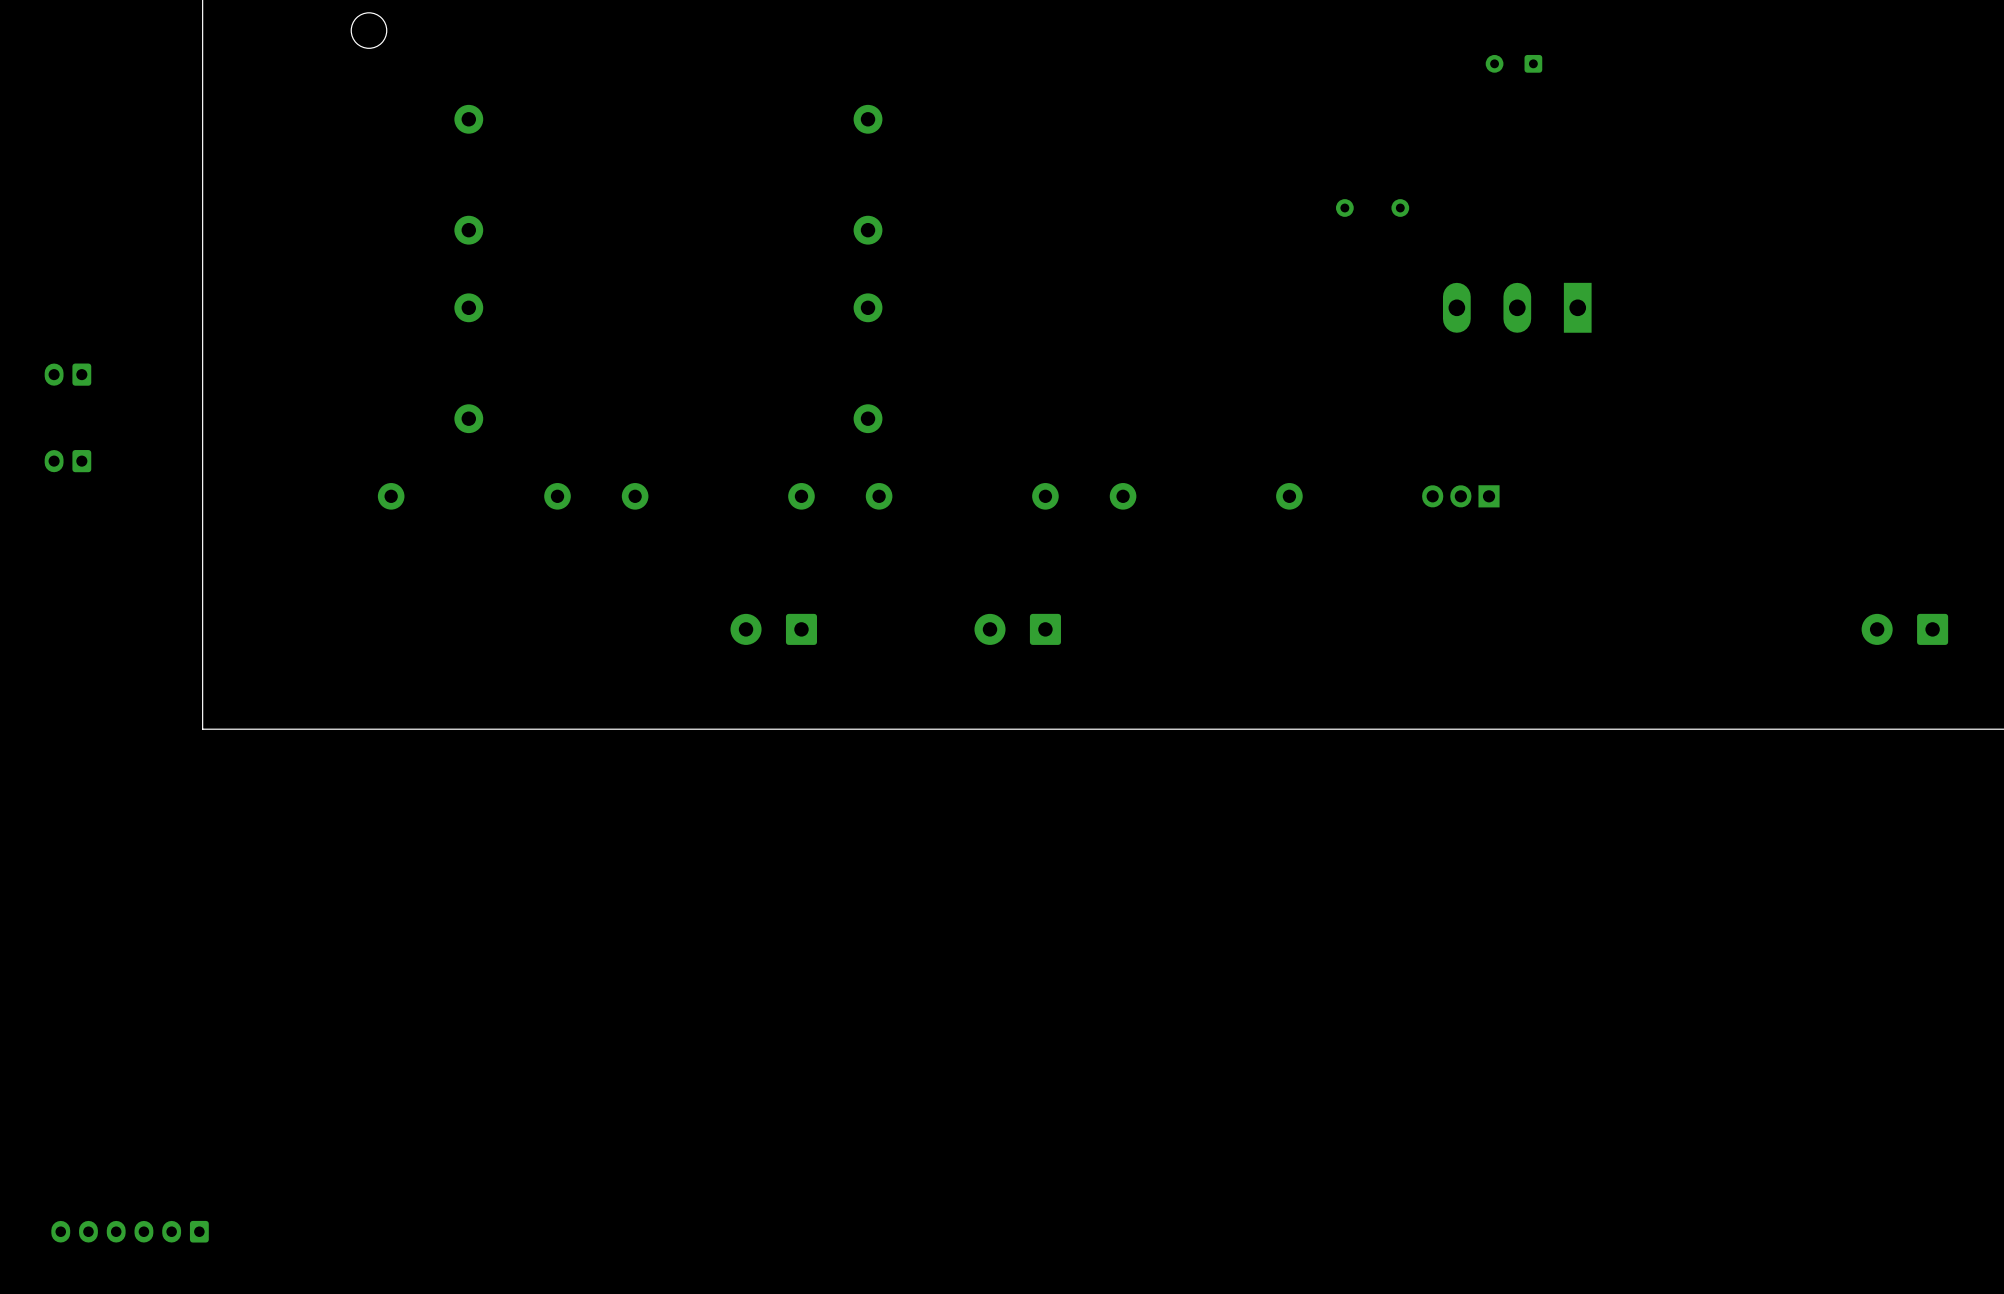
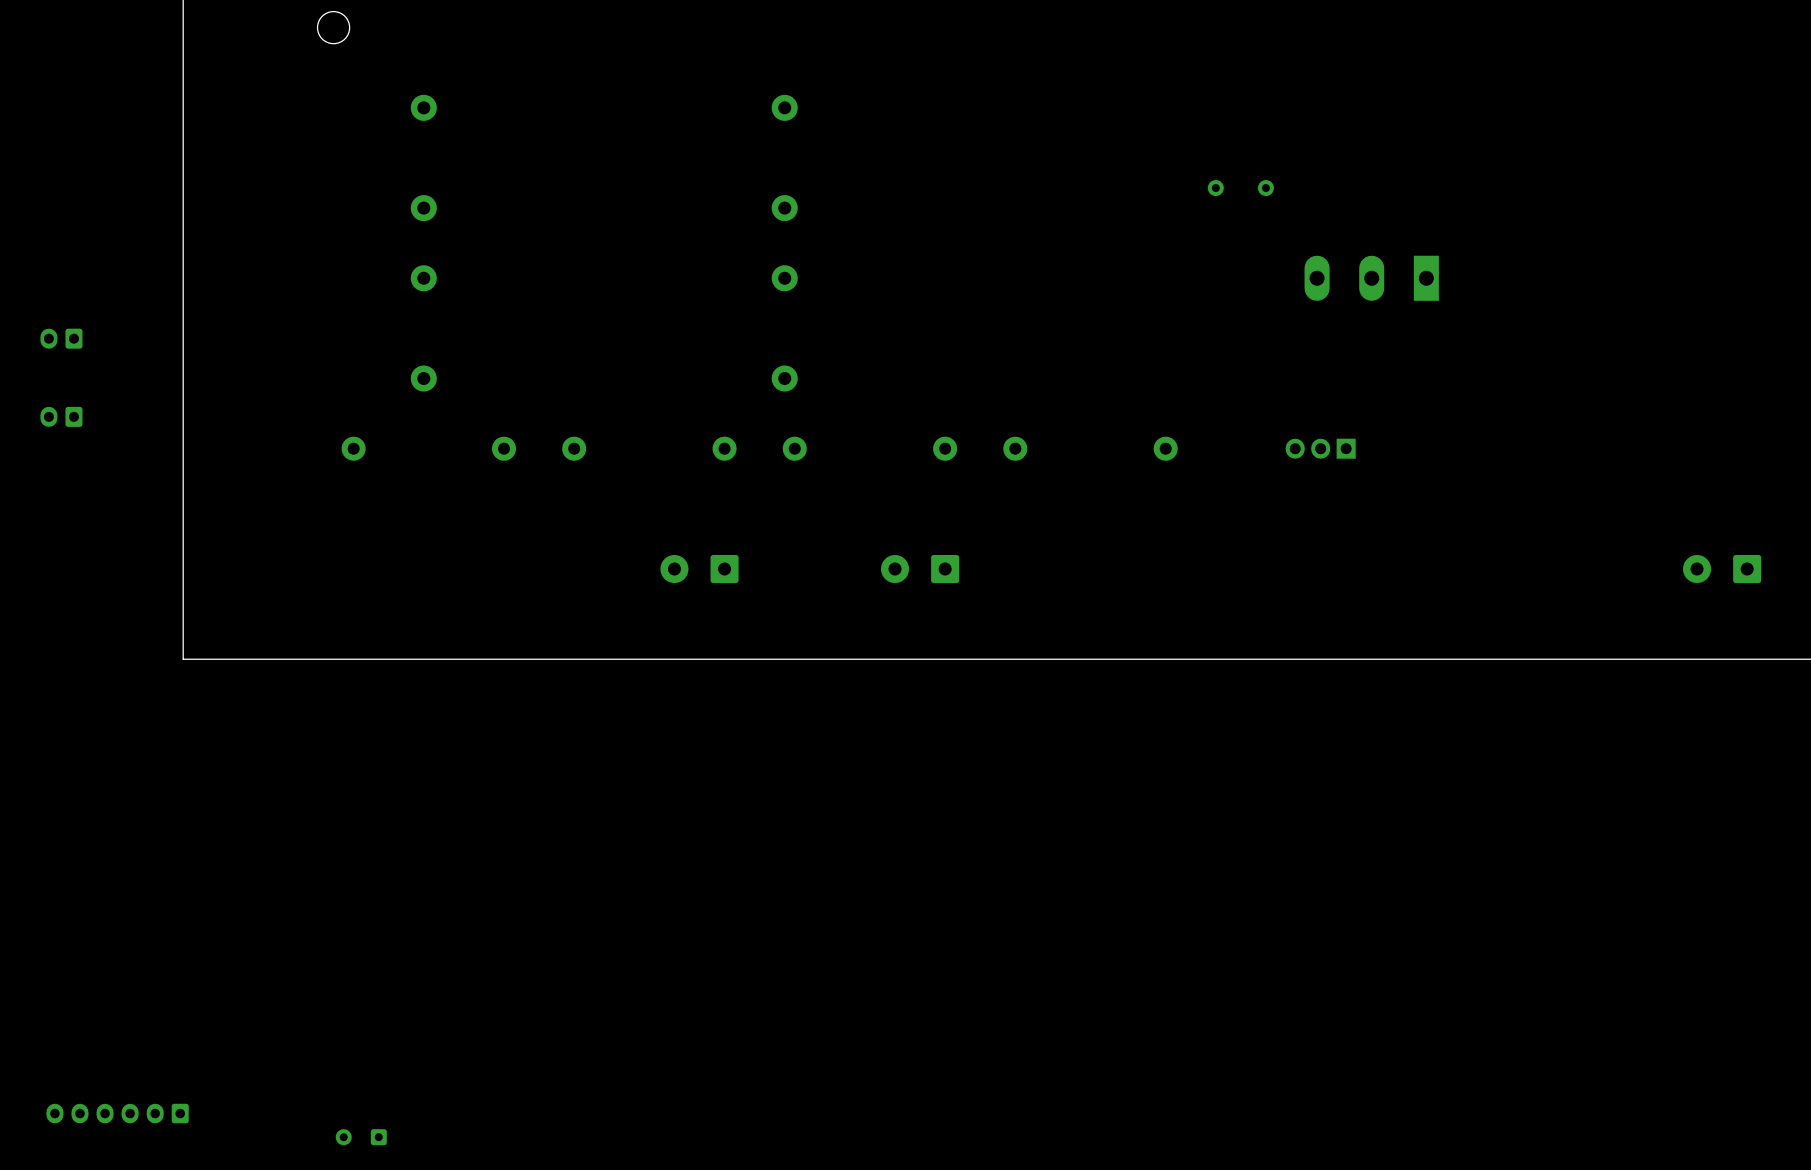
part: (1513, 63) -> none
part: none -> (361, 1137)

